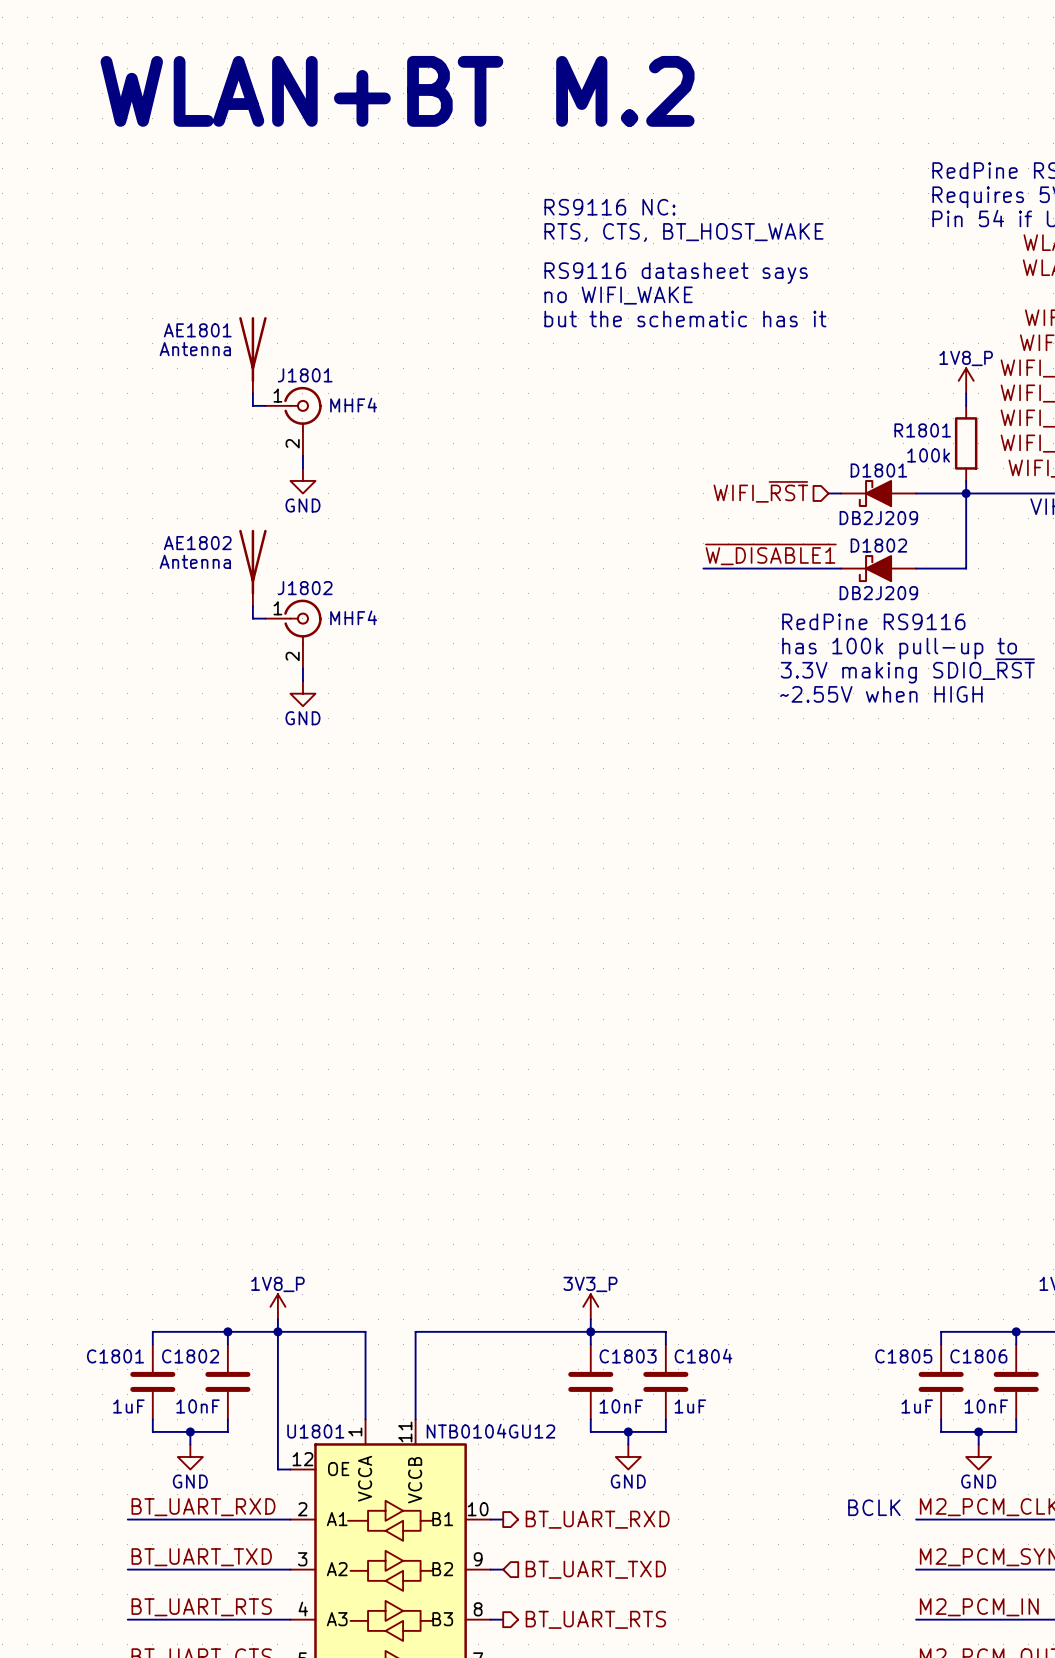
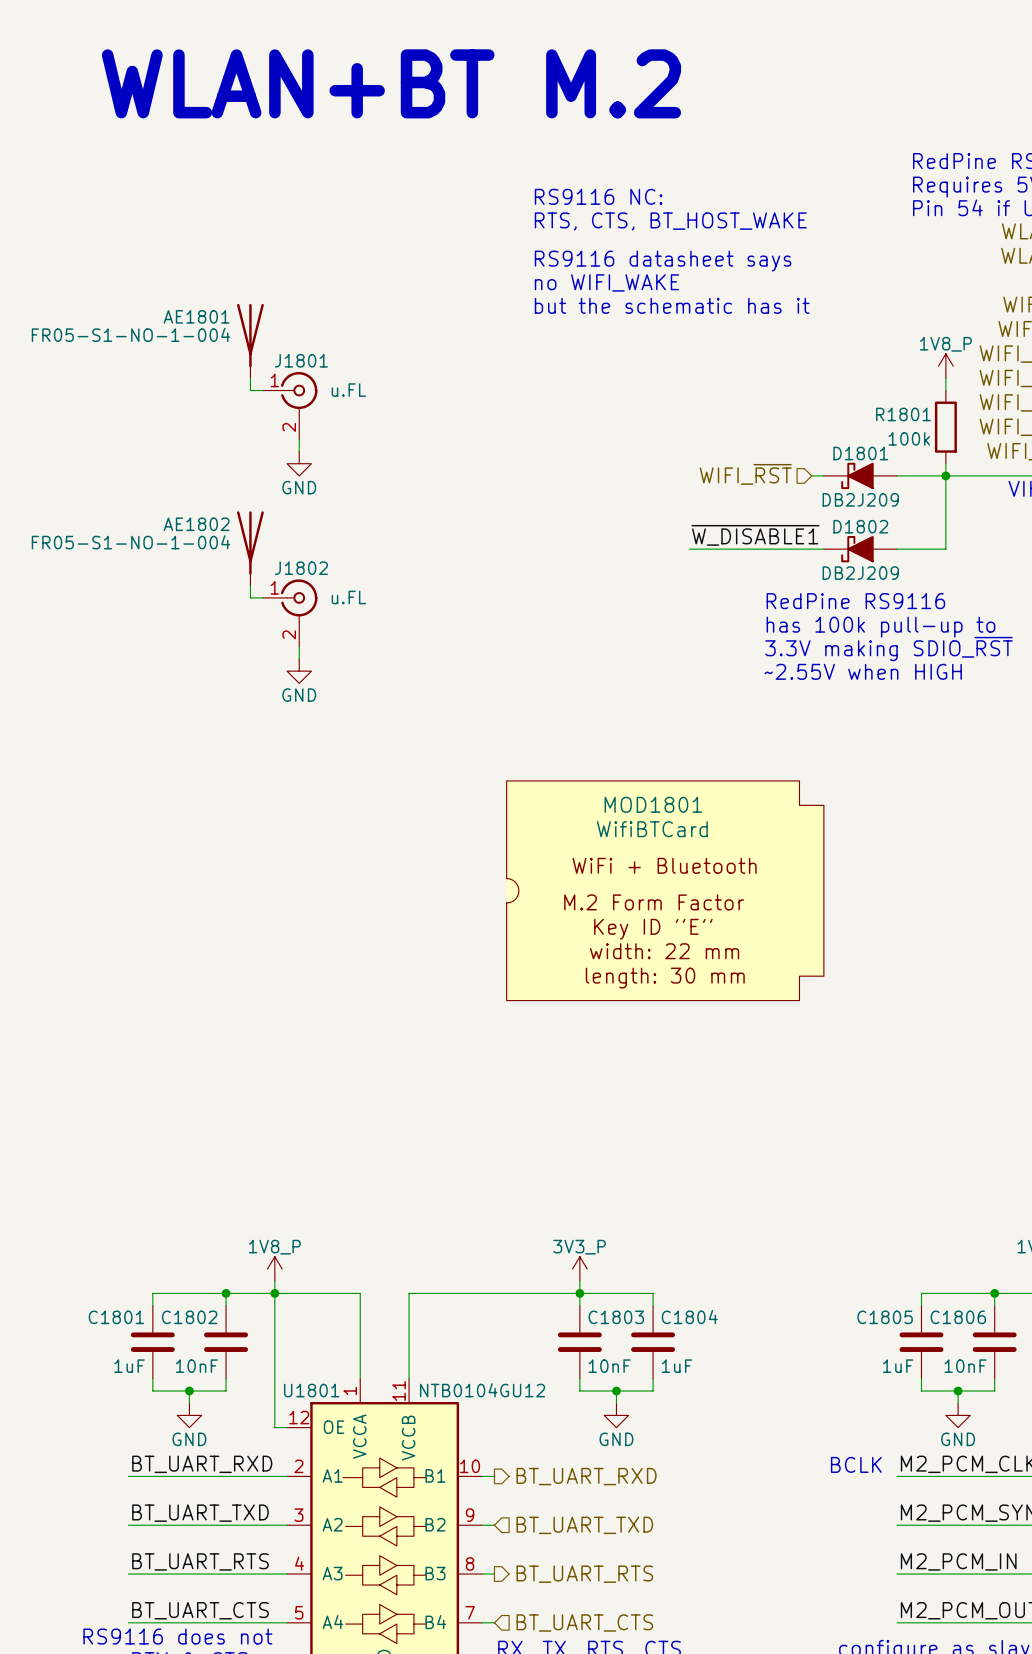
AE1801 value: Antenna (195, 349) -> FR05-S1-NO-1-004 (130, 334)
J1801 value: MHF4 (353, 405) -> u.FL (348, 390)
AE1802 value: Antenna (195, 561) -> FR05-S1-NO-1-004 (130, 542)
J1802 value: MHF4 (353, 617) -> u.FL (348, 597)
MOD1801: none -> WifiBTCard (665, 890)

